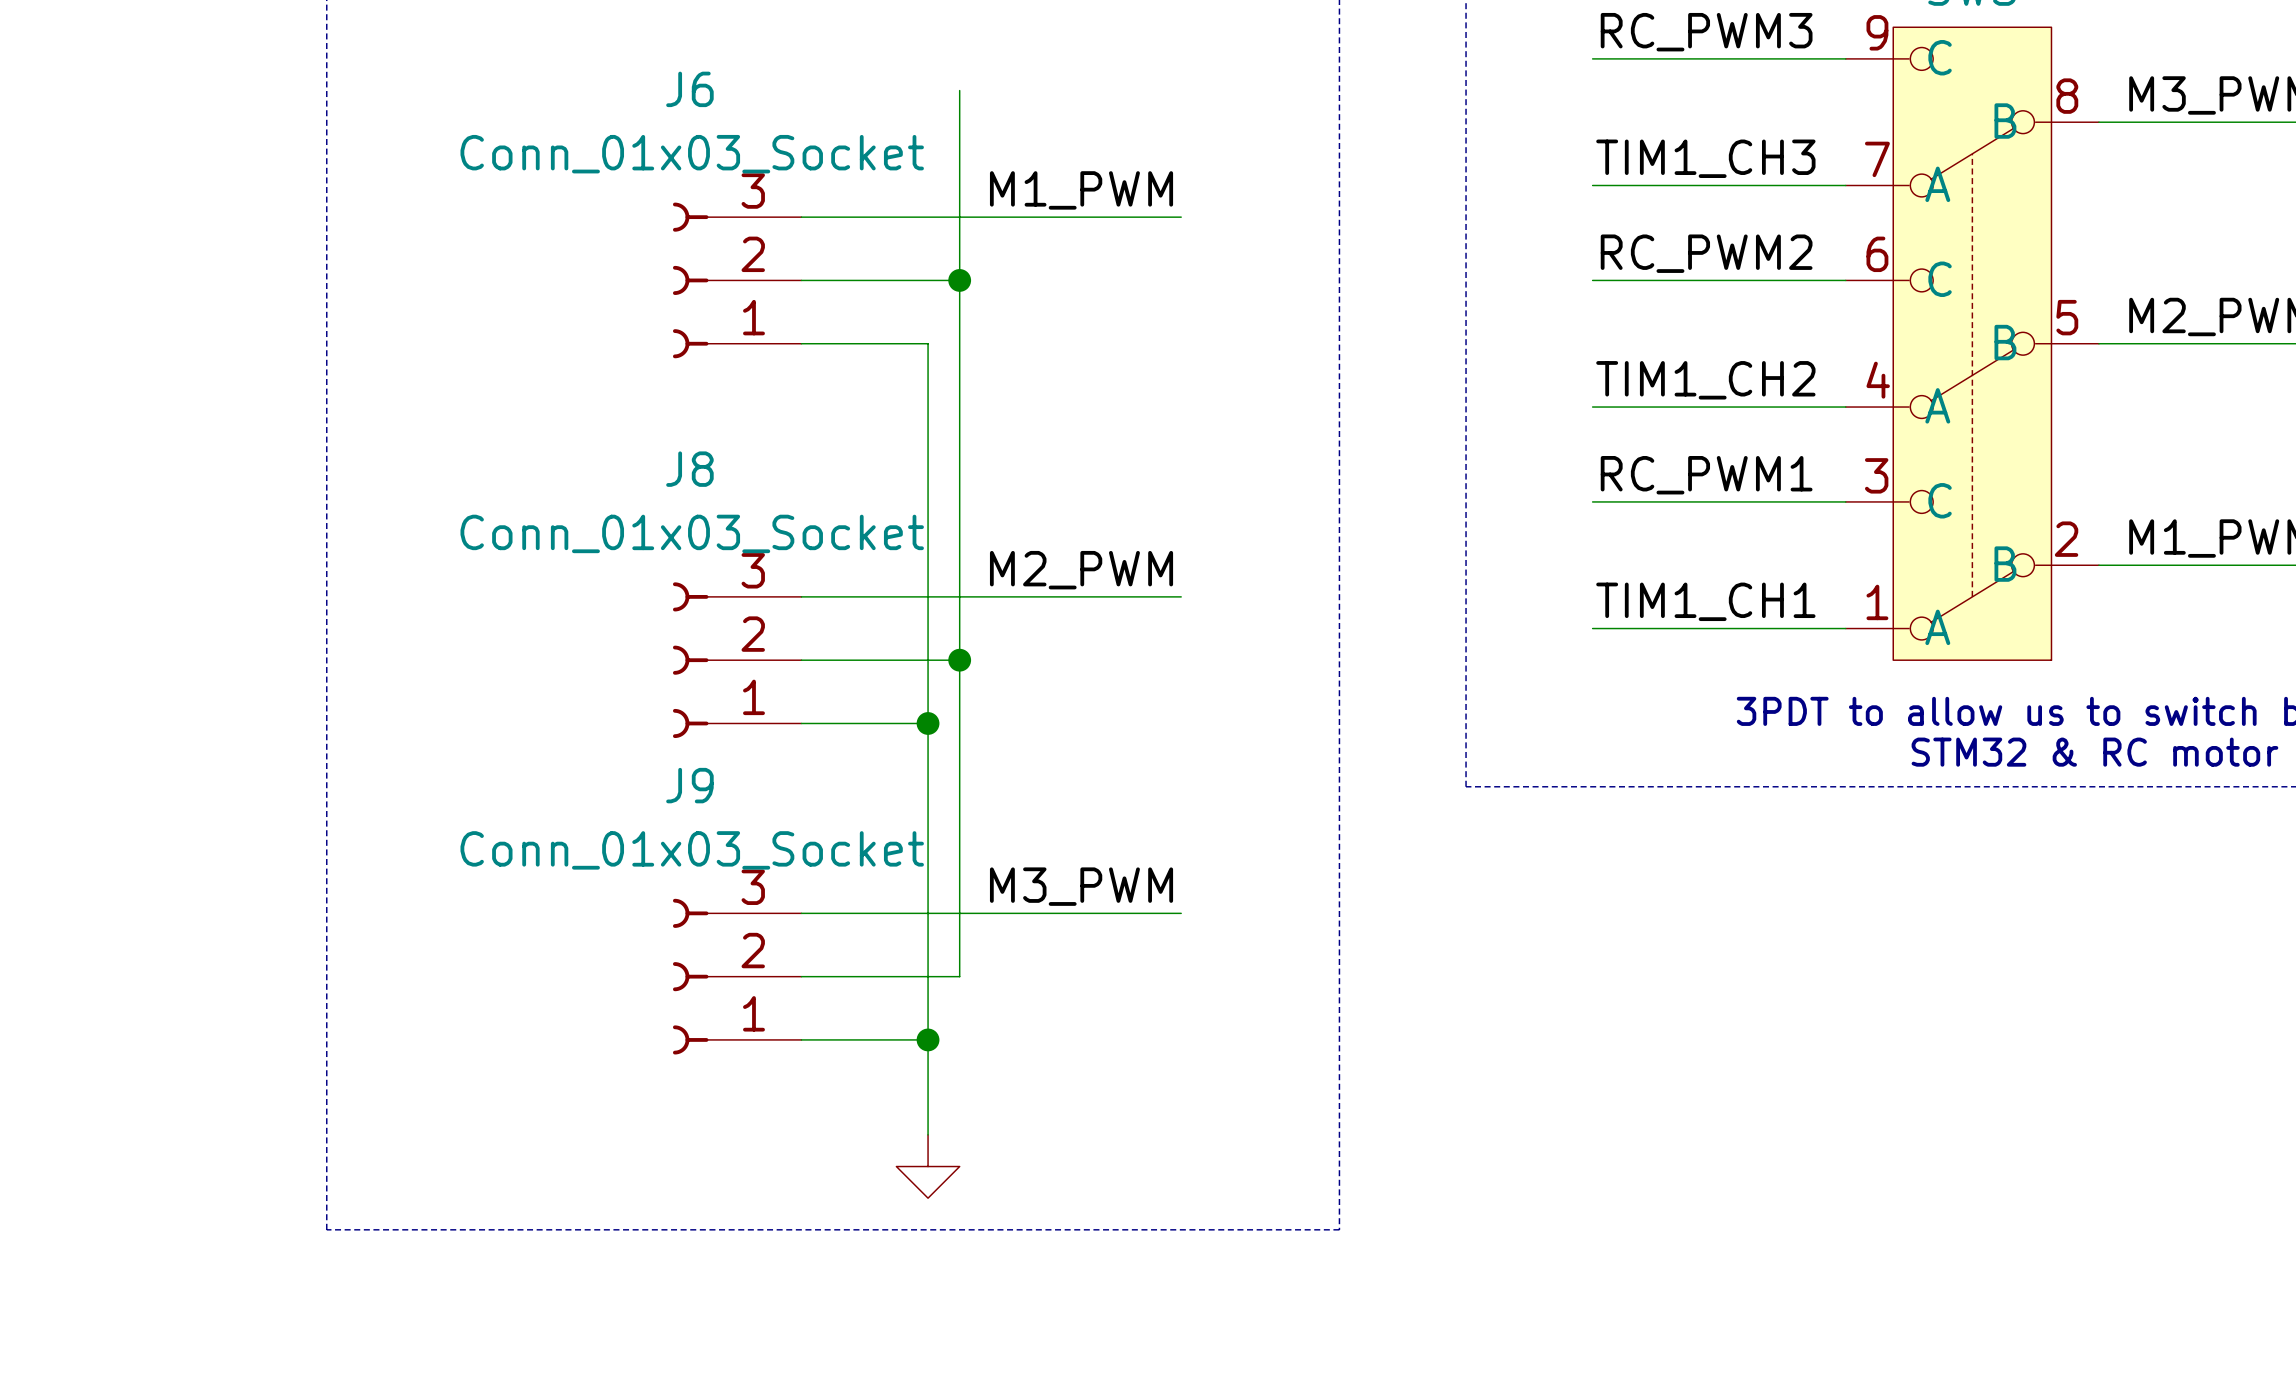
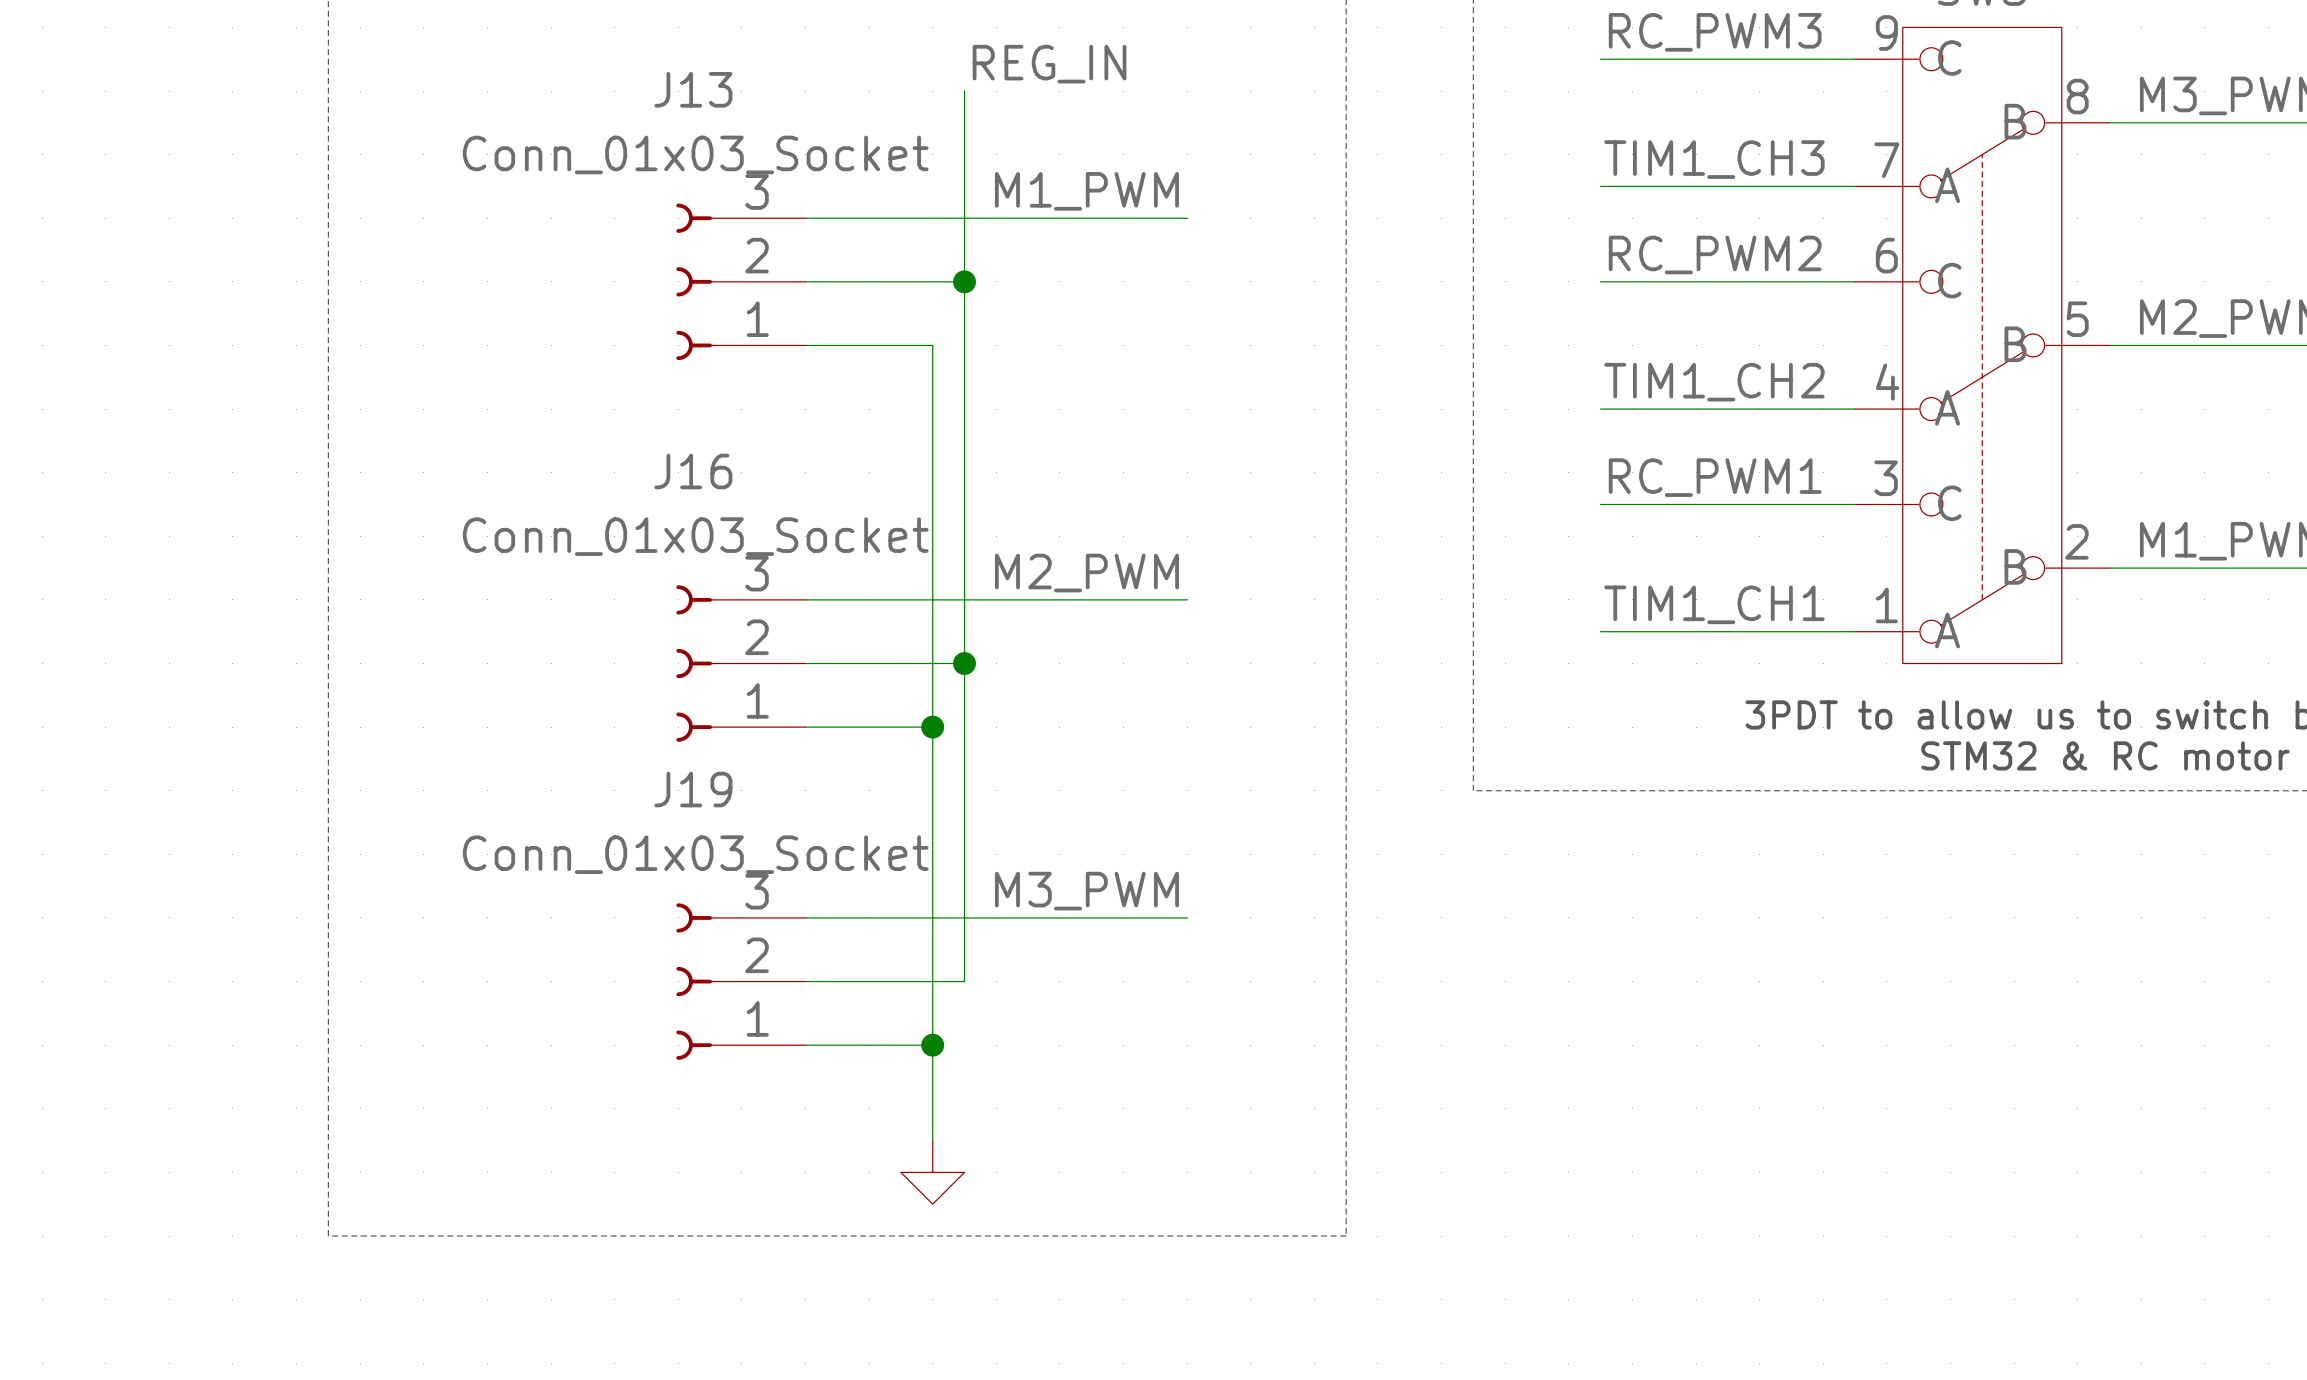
label: none -> REG_IN (1049, 64)
J6 name: J6 (689, 89) -> J13 (693, 89)
J8 name: J8 (689, 469) -> J16 (693, 471)
J9 name: J9 (689, 785) -> J19 (693, 789)

